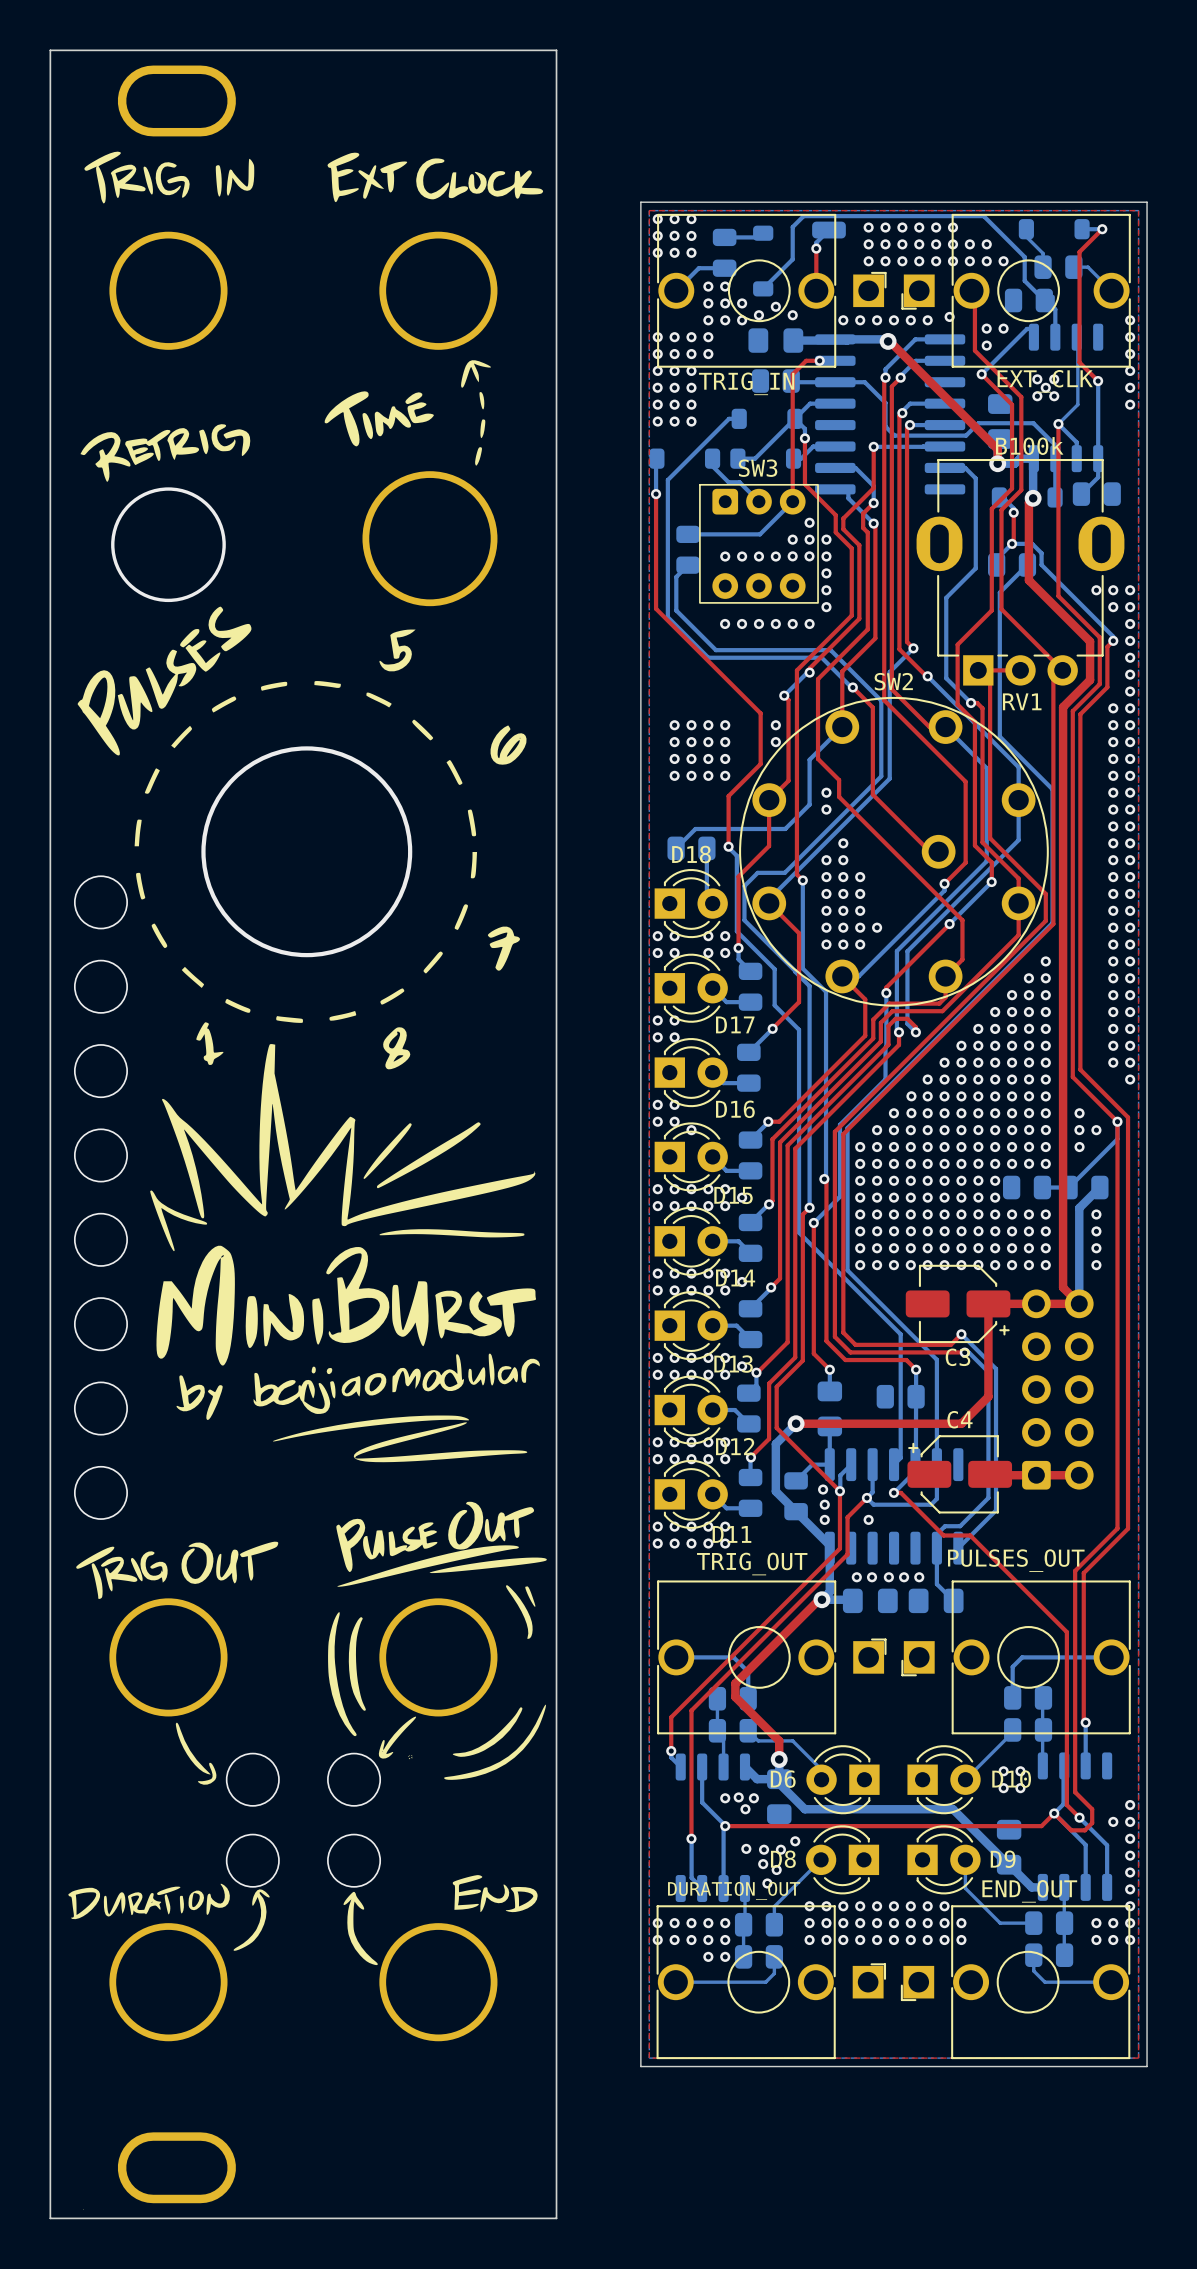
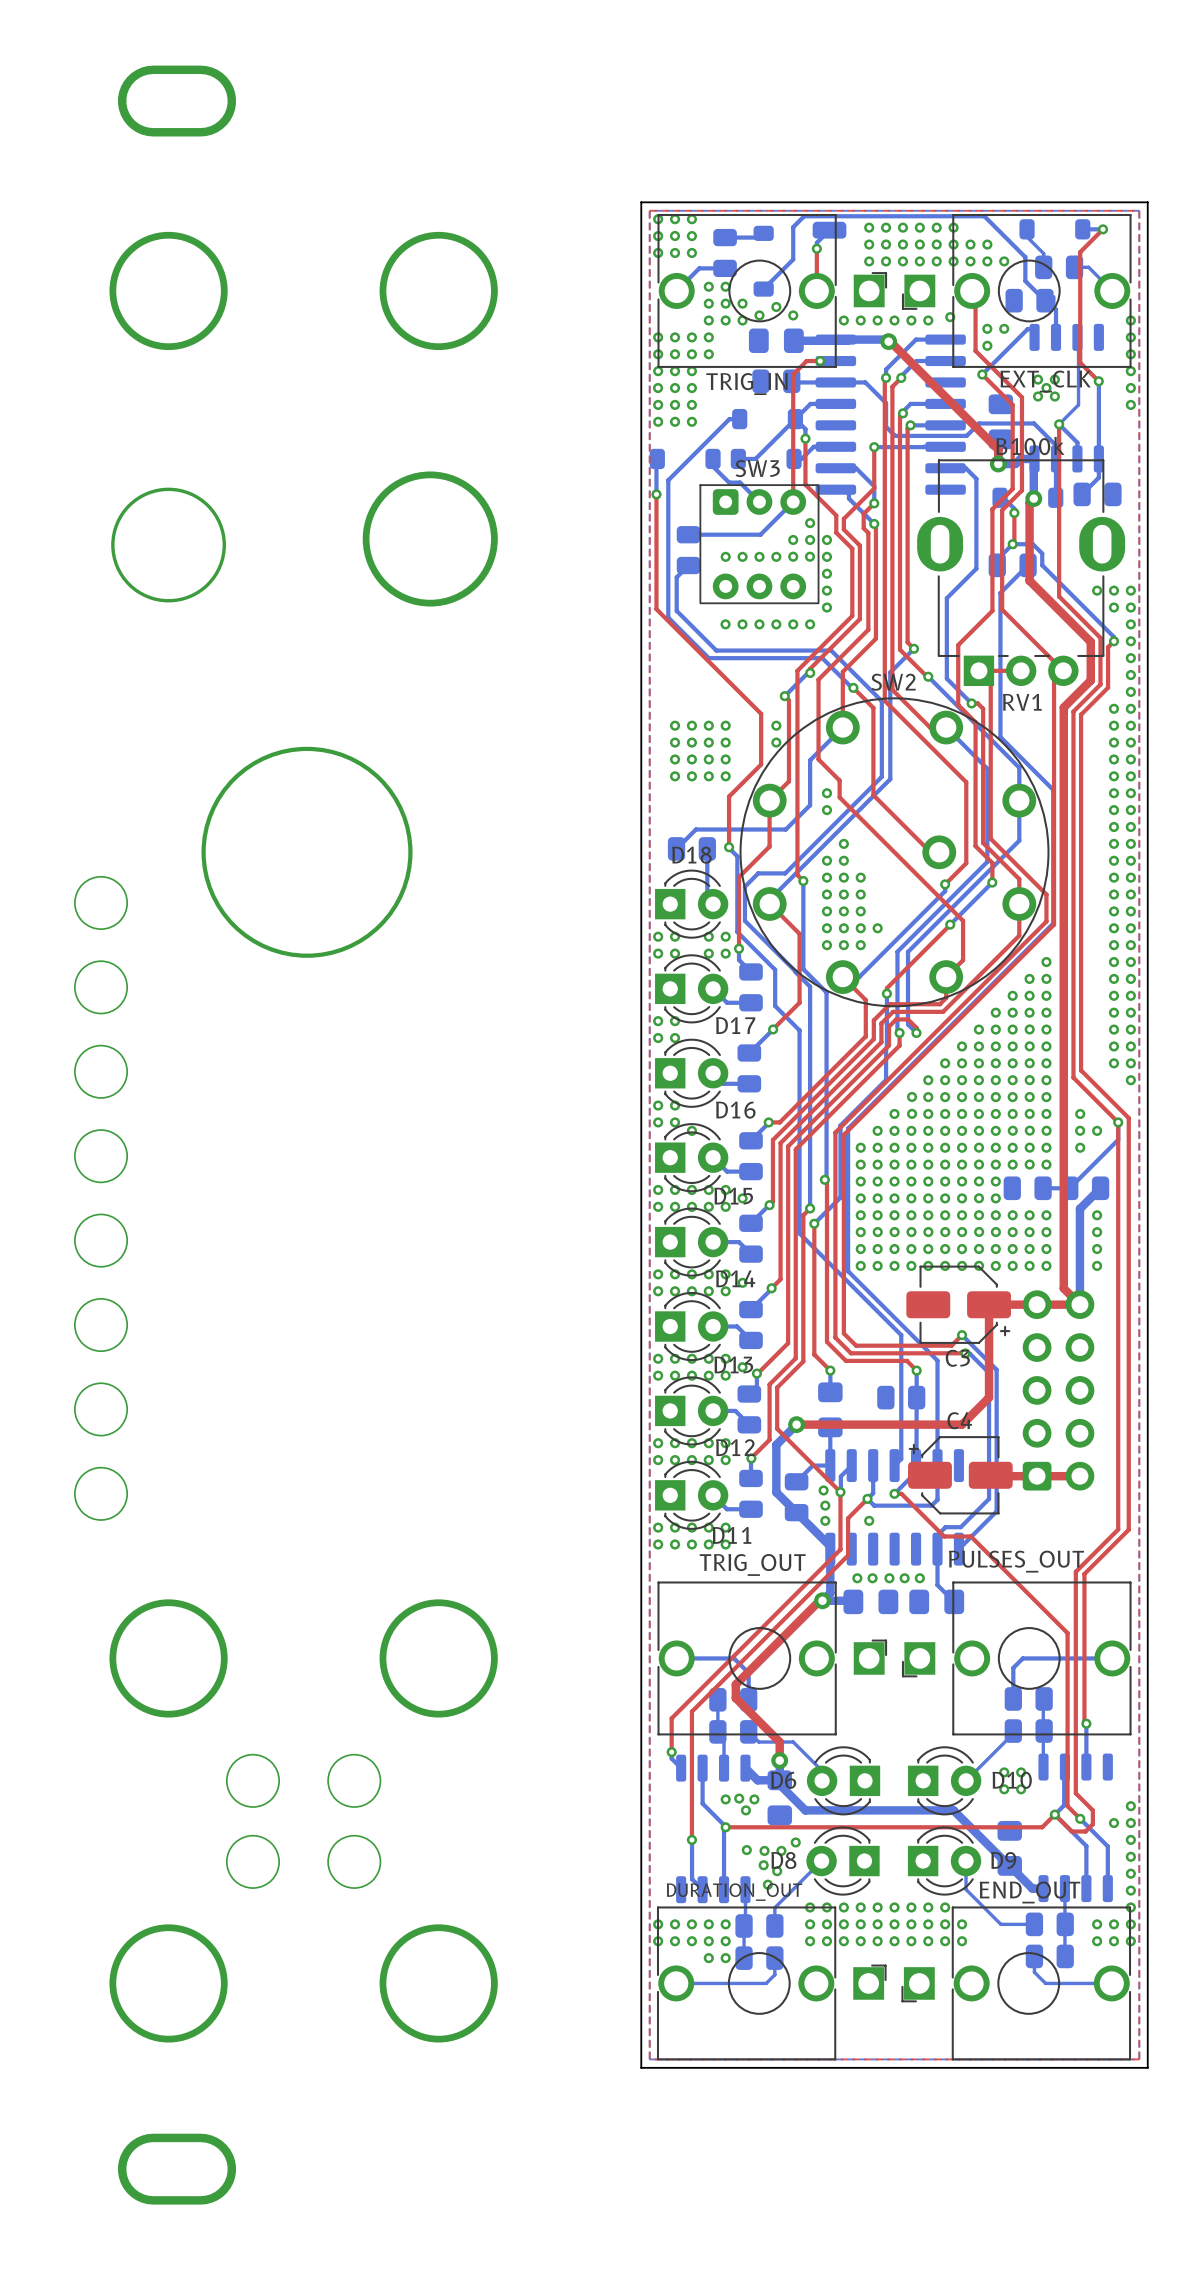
board edge: (50, 50) (556, 50) (556, 2218) (50, 2218) (50, 50) -> none
drawing: [68, 151, 547, 2210] -> none

